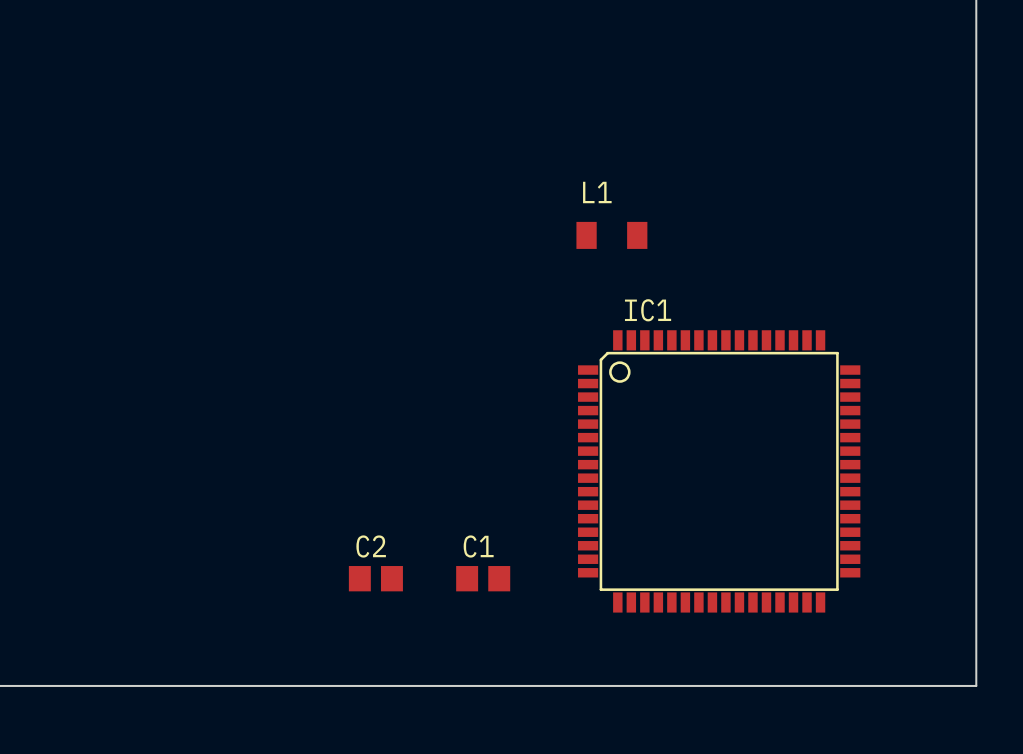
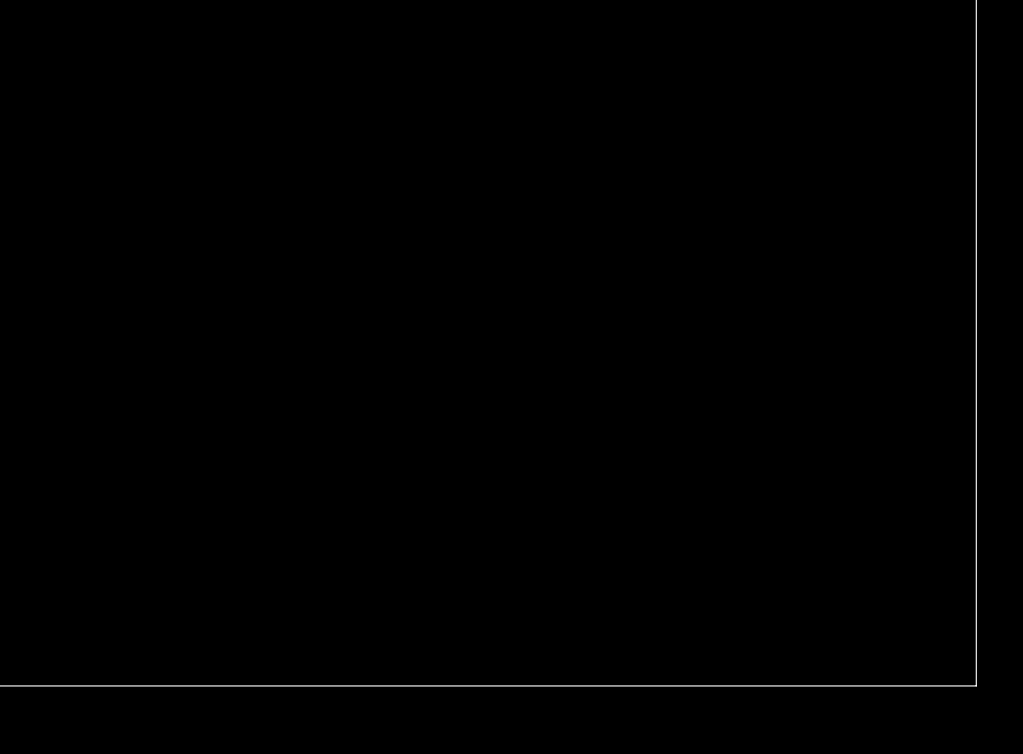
L1: (611, 235) -> none
IC1: (719, 471) -> none
C2: (375, 578) -> none
C1: (483, 578) -> none

